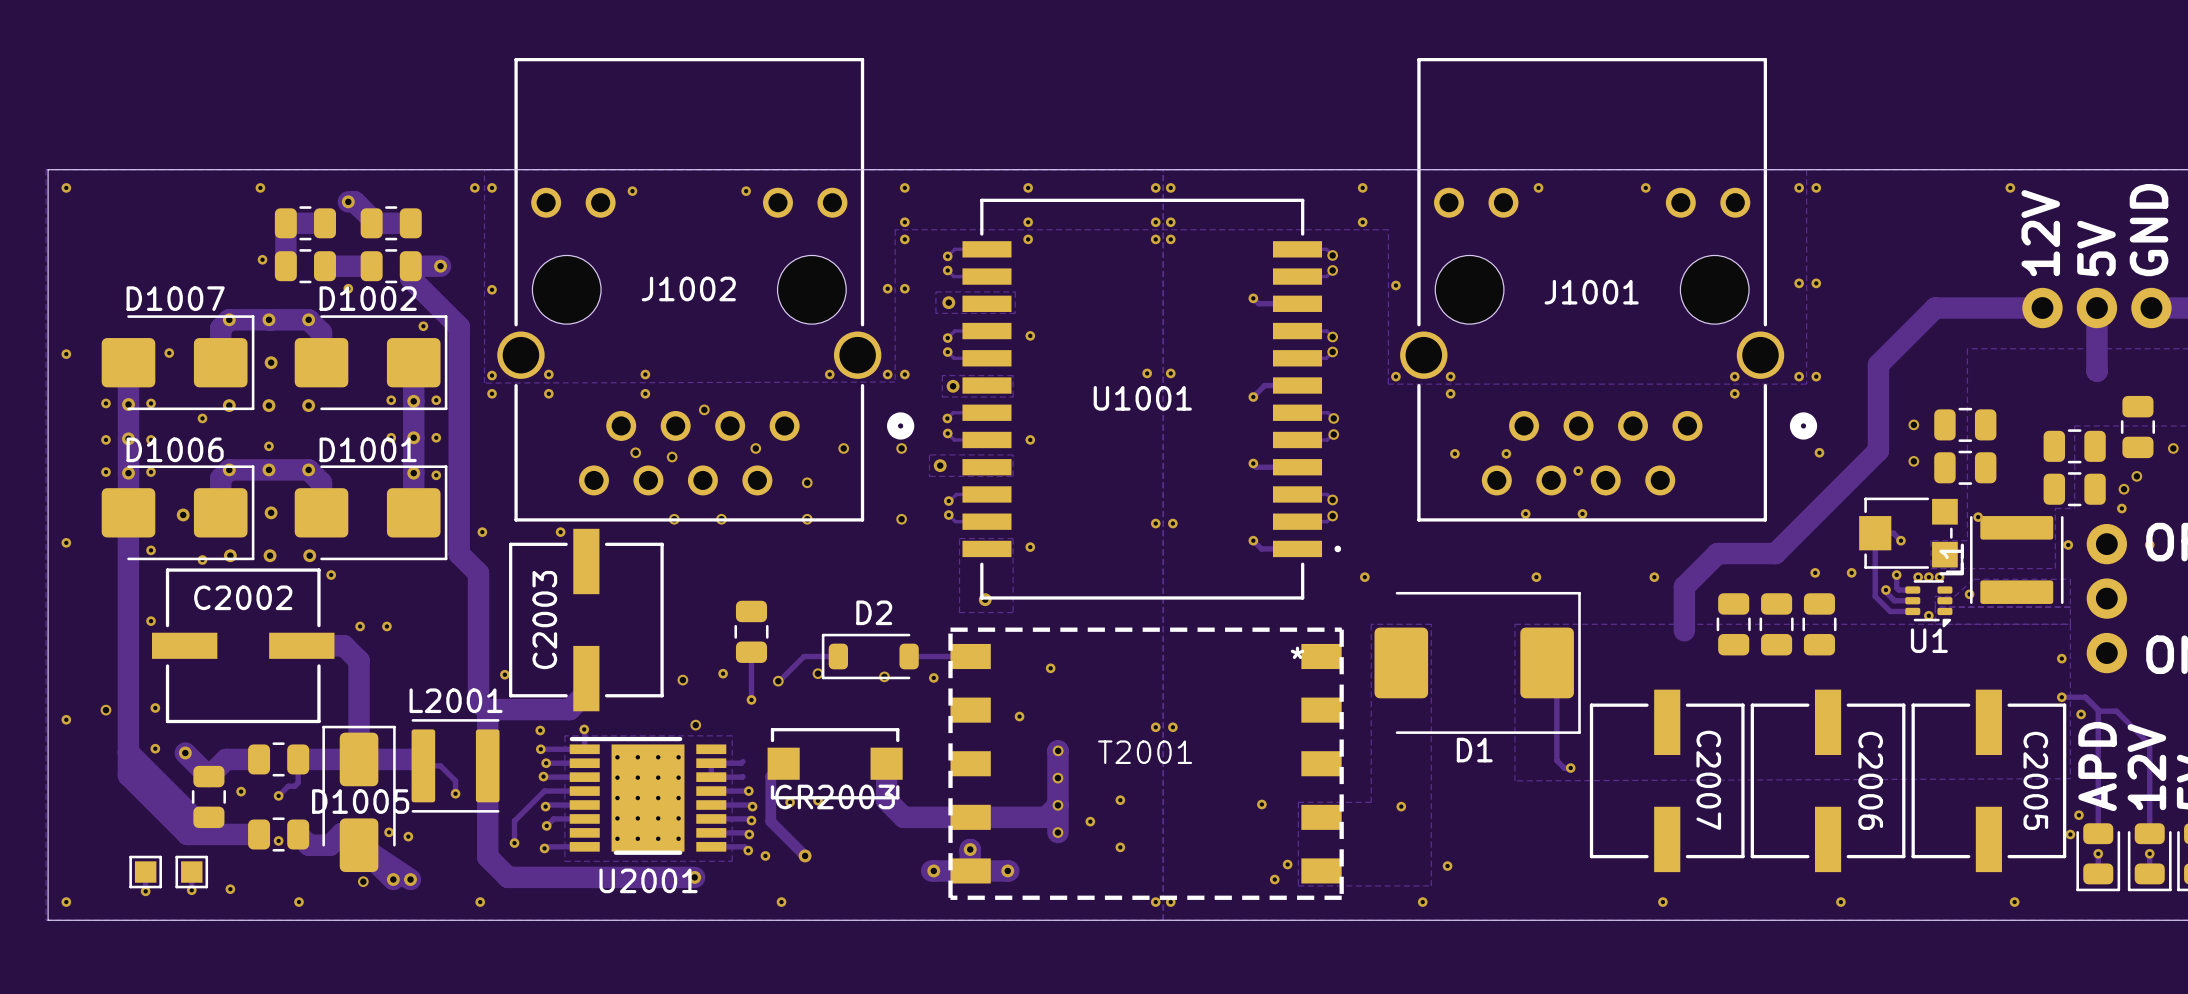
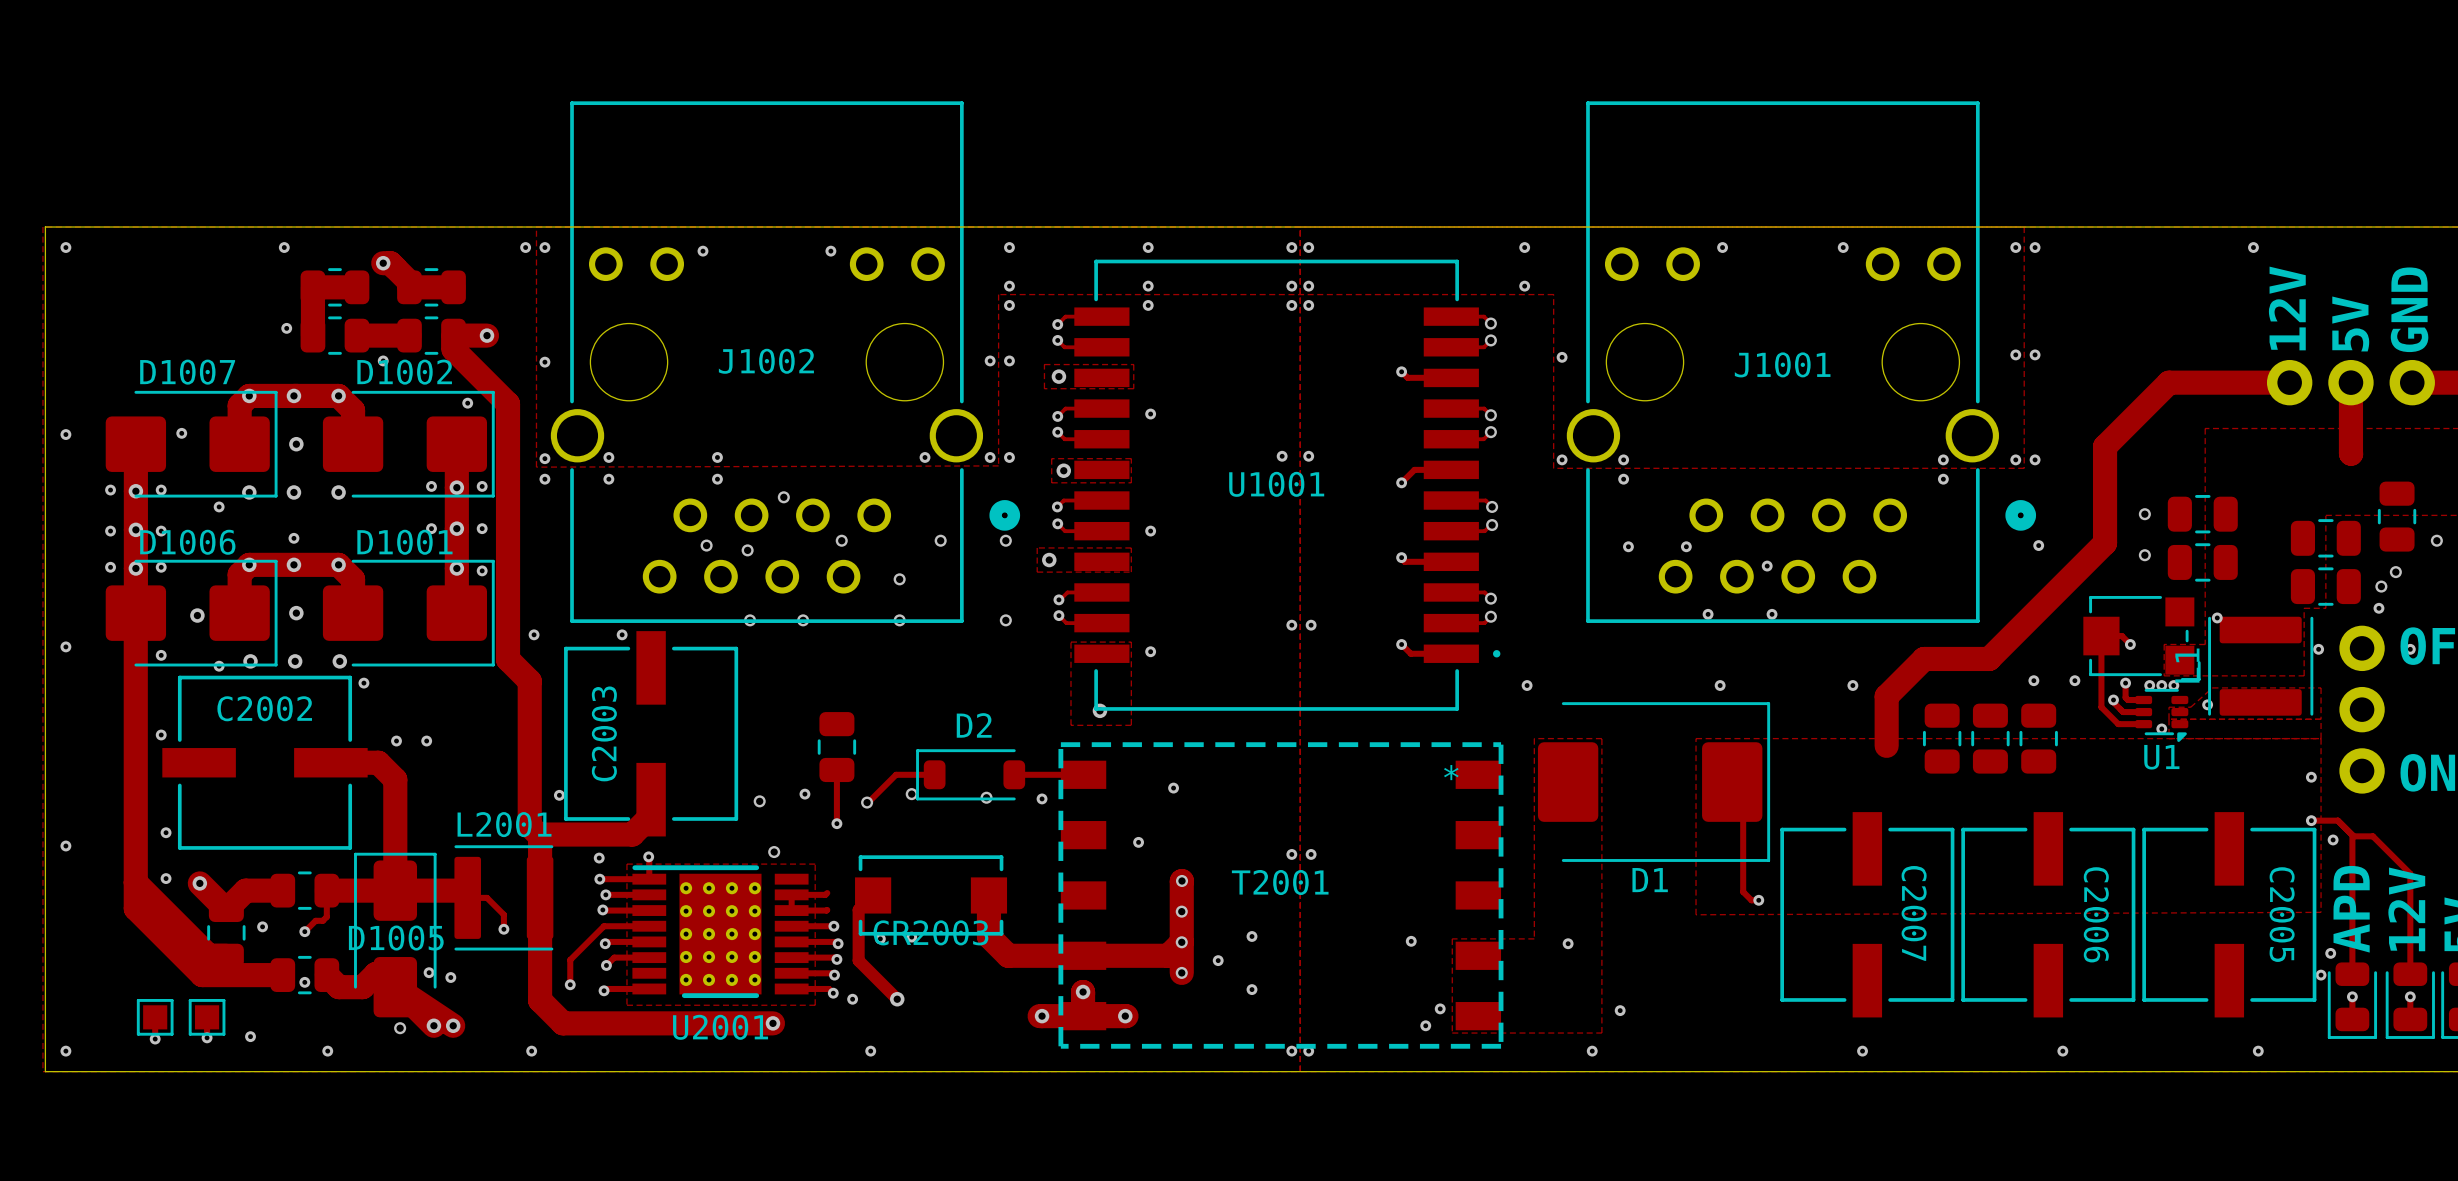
via: (105, 710) -> none

